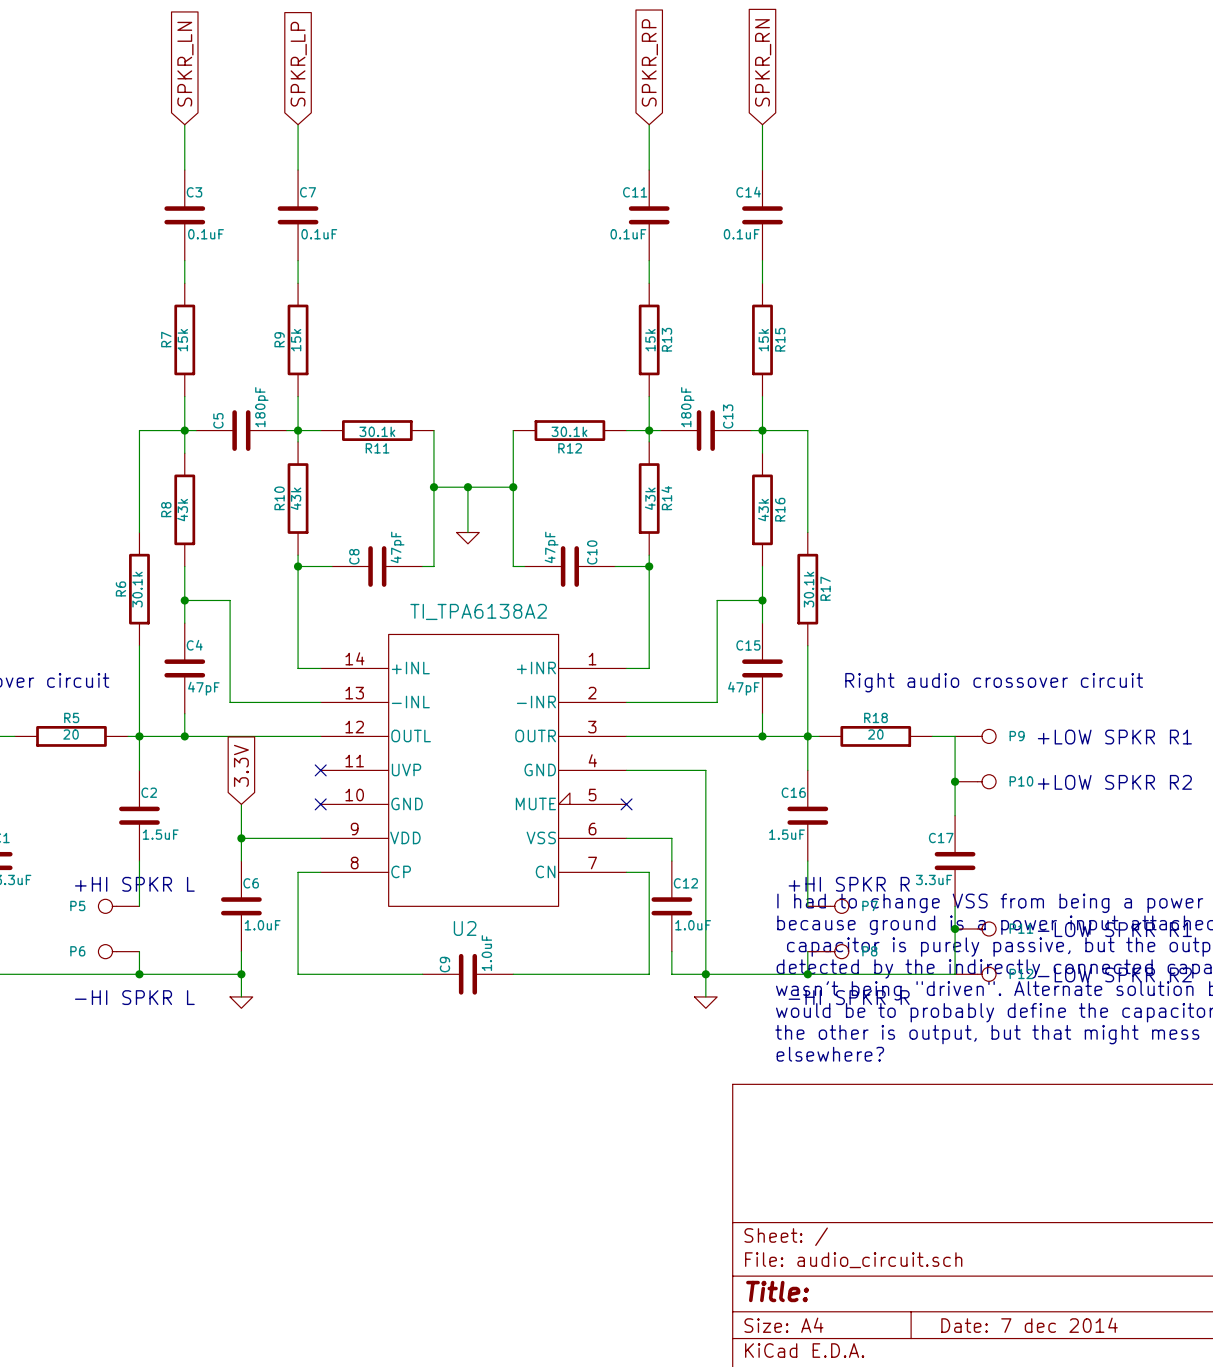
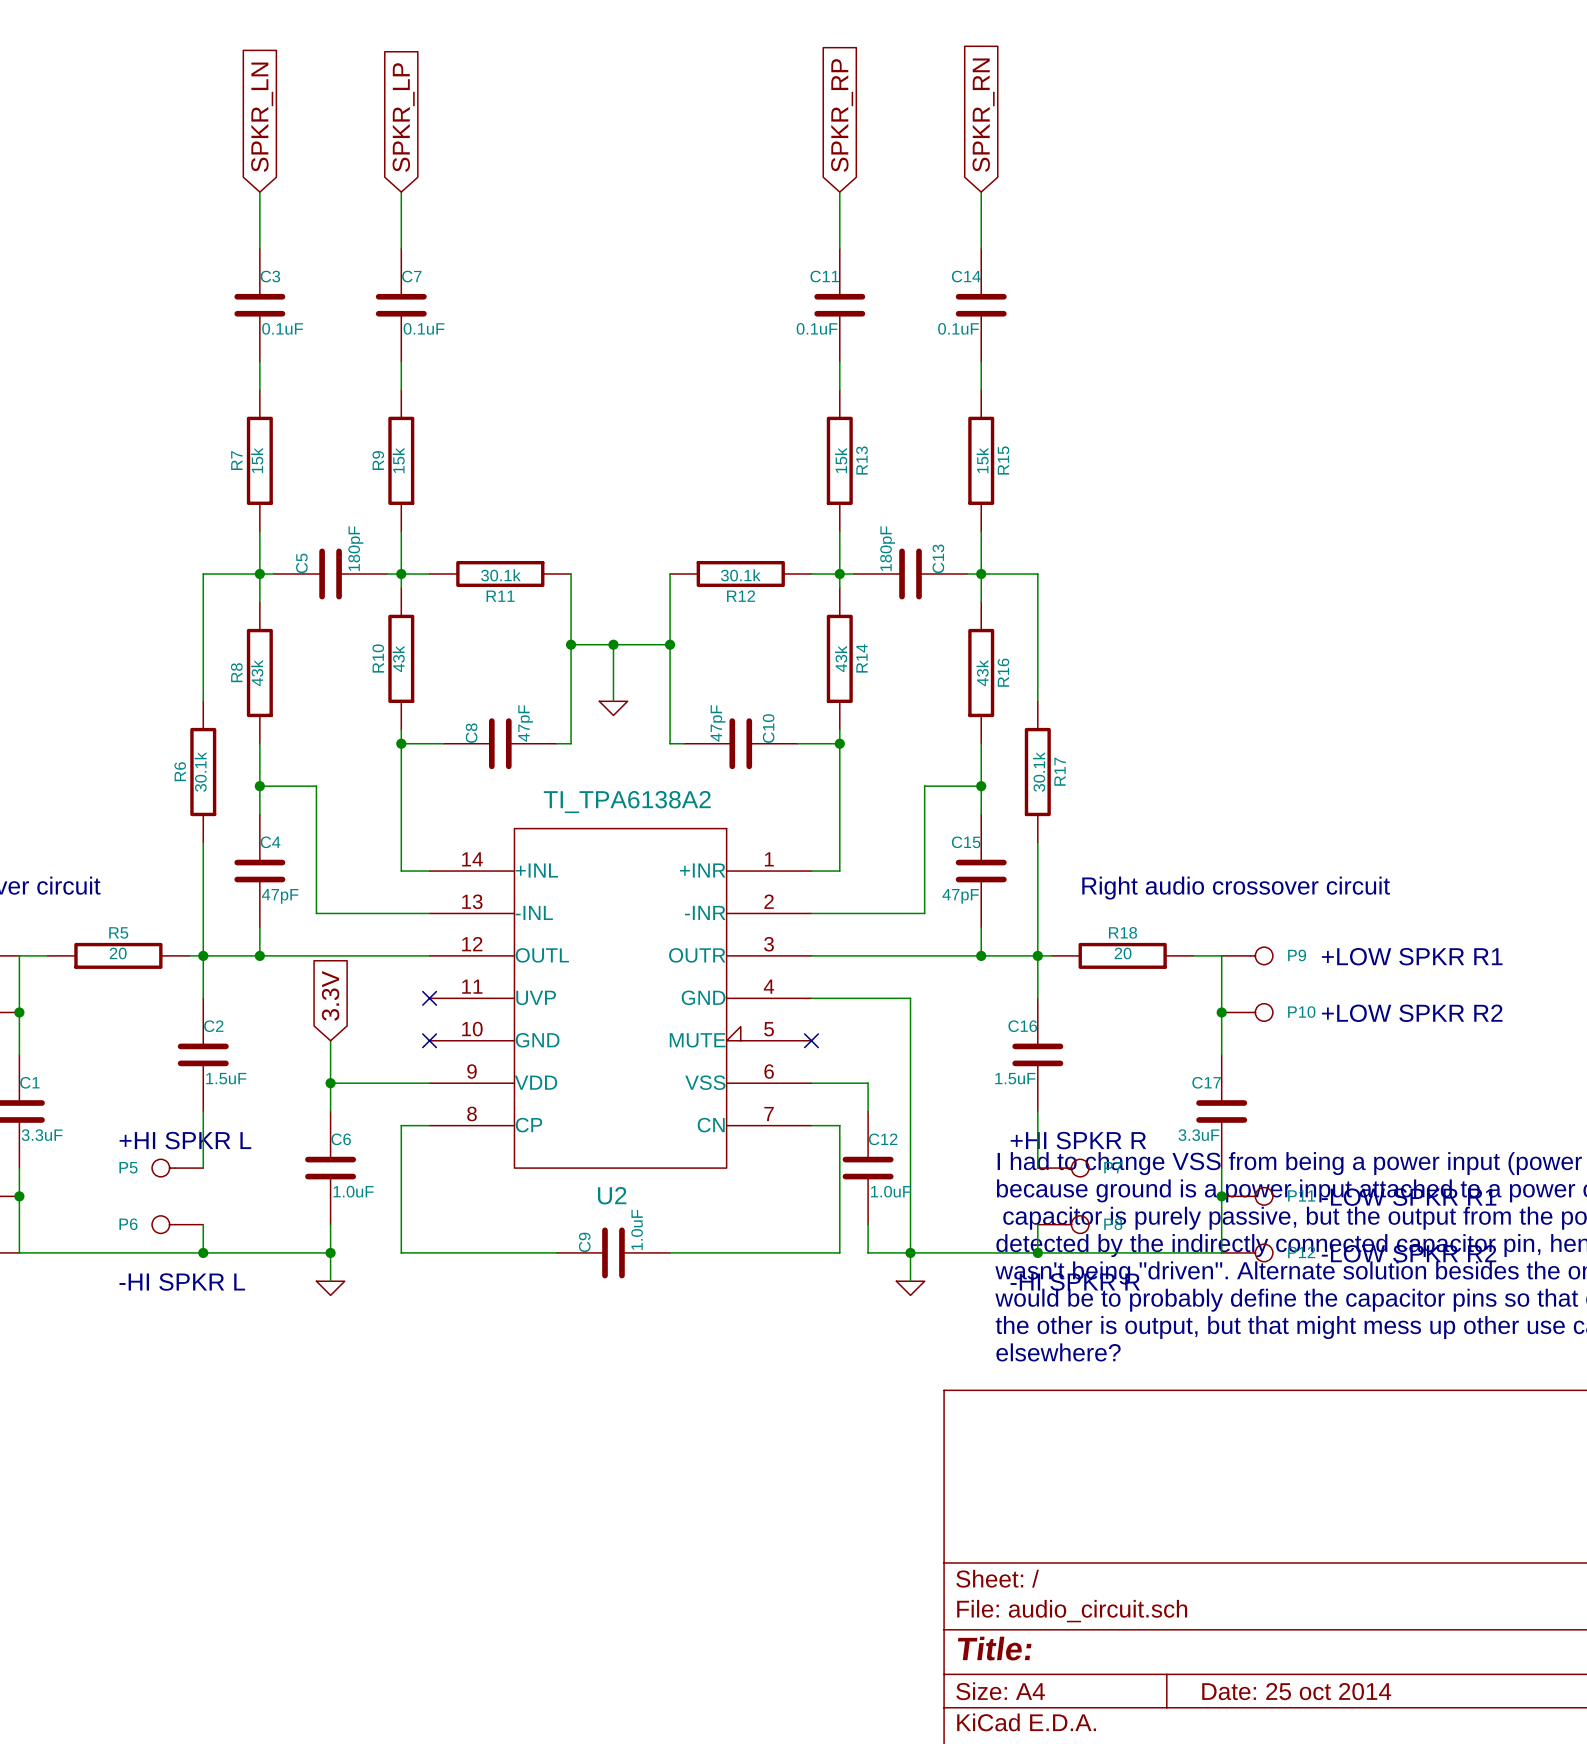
title block: Date: 7 dec 2014 (1029, 1325) -> Date: 25 oct 2014 (1296, 1691)

